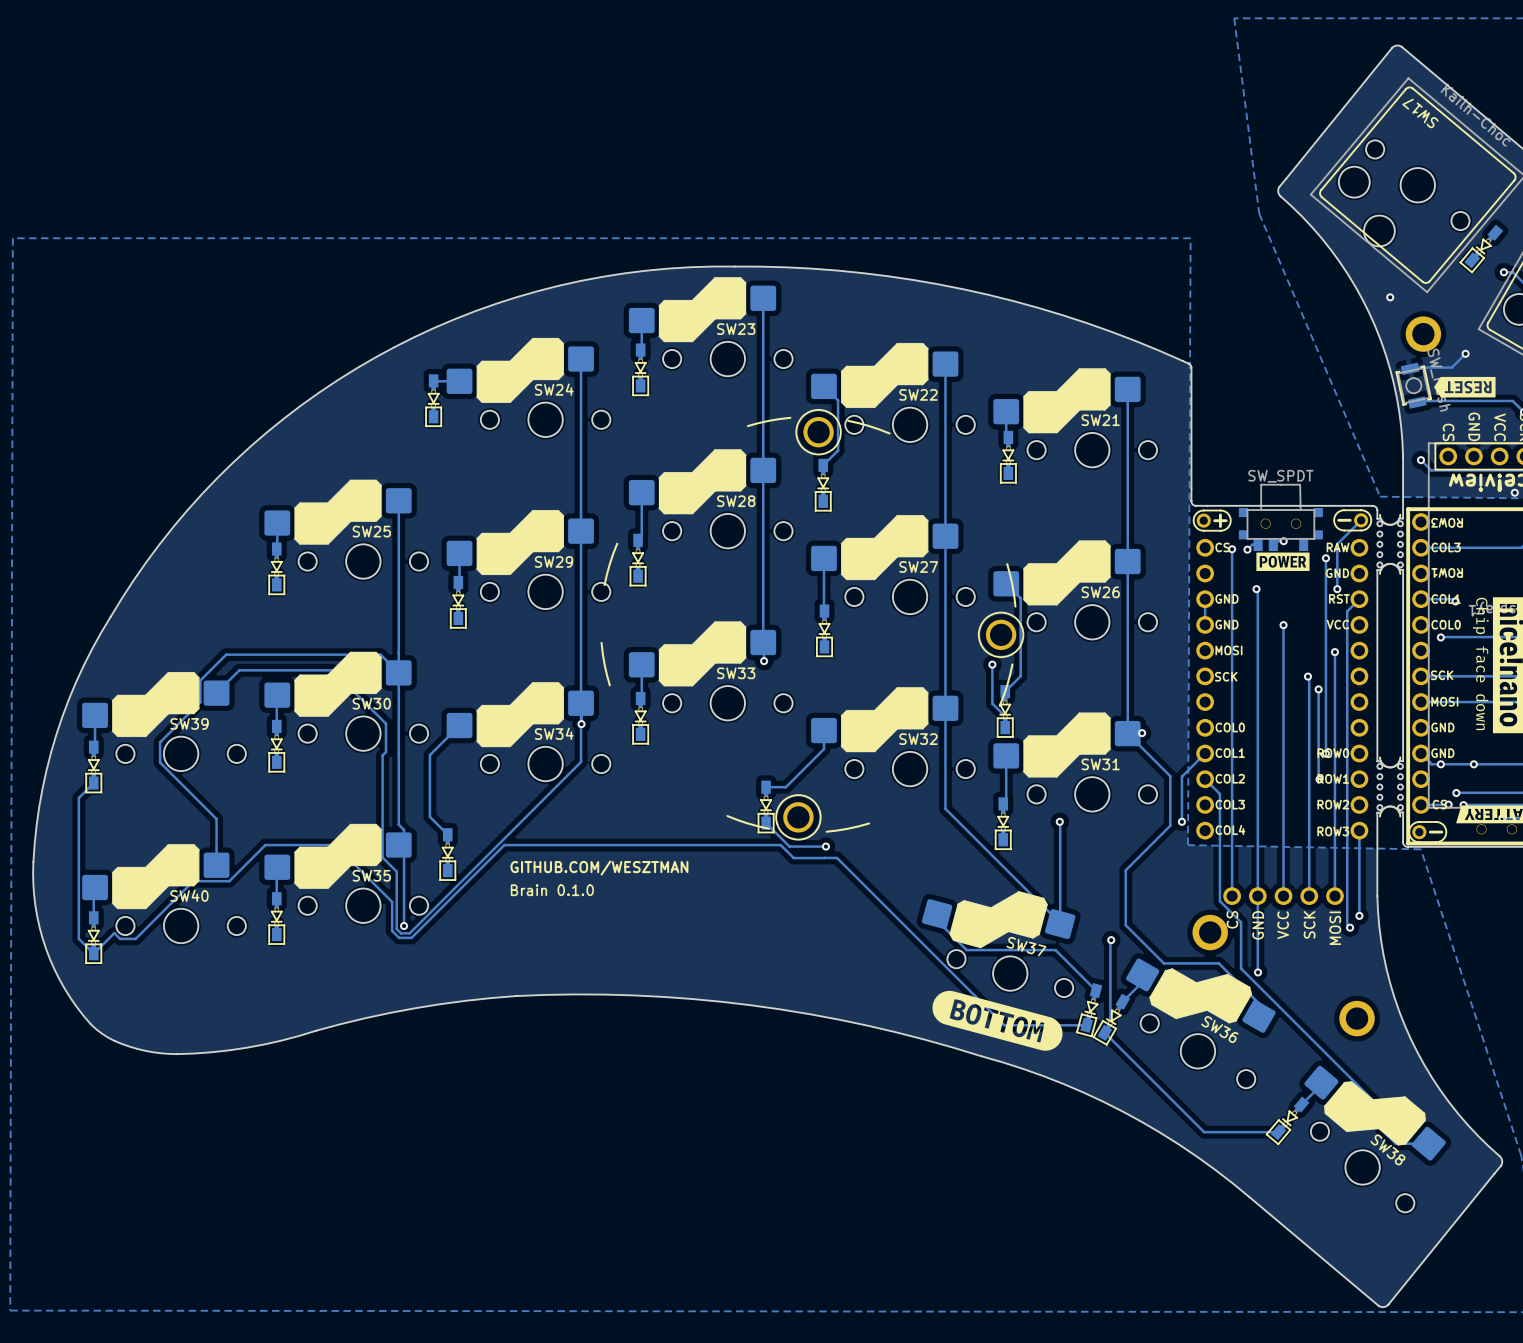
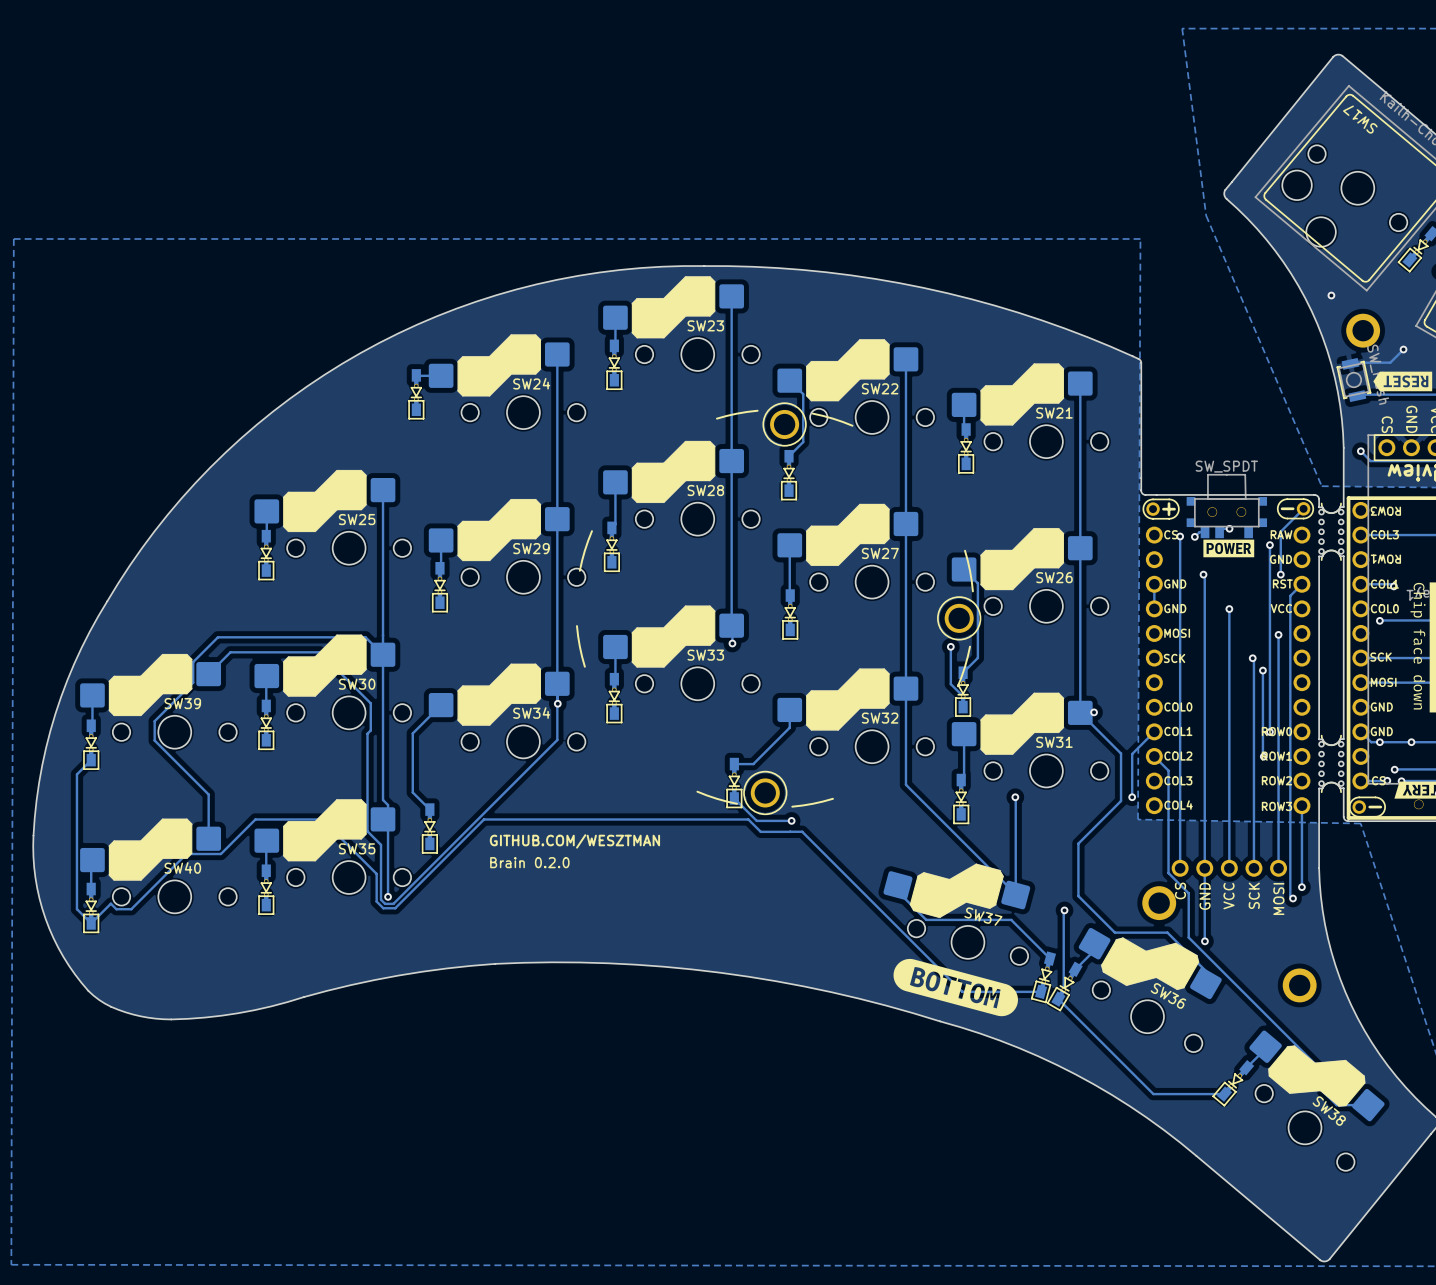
text: Brain 0.1.0 (552, 890) -> Brain 0.2.0 (529, 862)

